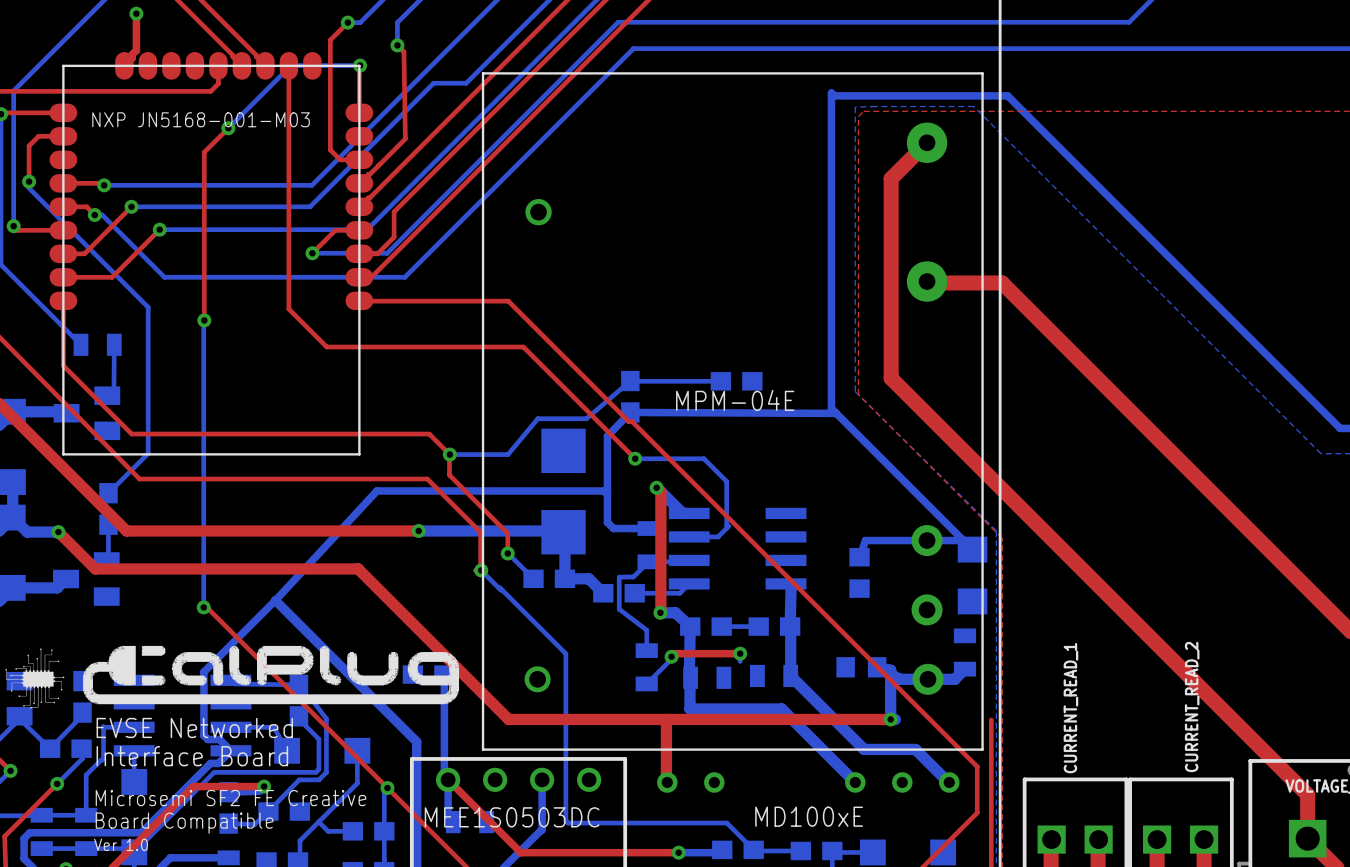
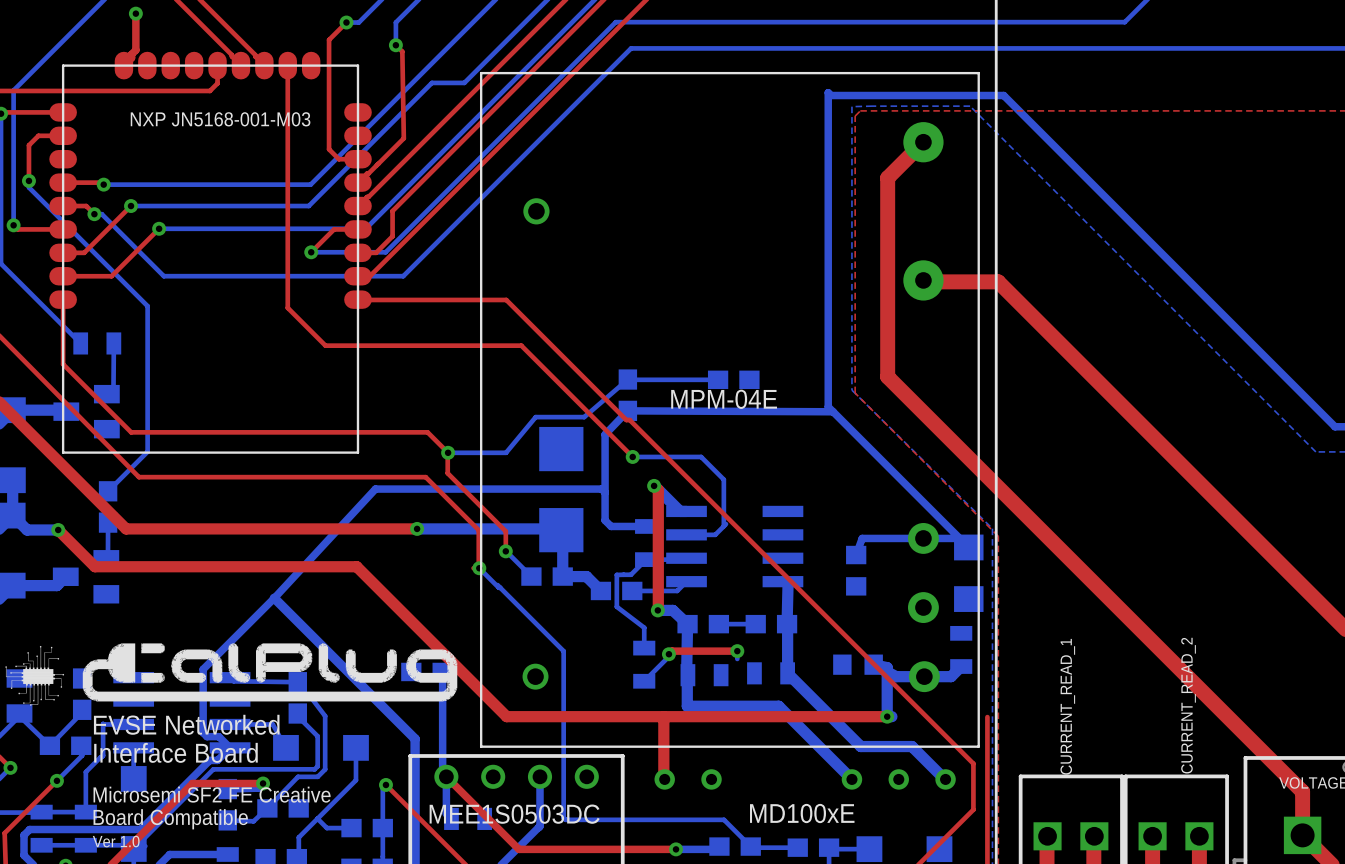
bottom track: (360, 65) (291, 65) (228, 128) -> none
top track: (360, 65) (359, 112) -> none
via: (360, 65) -> none
top track: (228, 128) (204, 152) (204, 320) -> none
via: (228, 128) -> none
bottom track: (204, 320) (203, 607) -> none
via: (204, 320) -> none
top track: (203, 607) (206, 607) (387, 788) -> none
via: (203, 607) -> none

